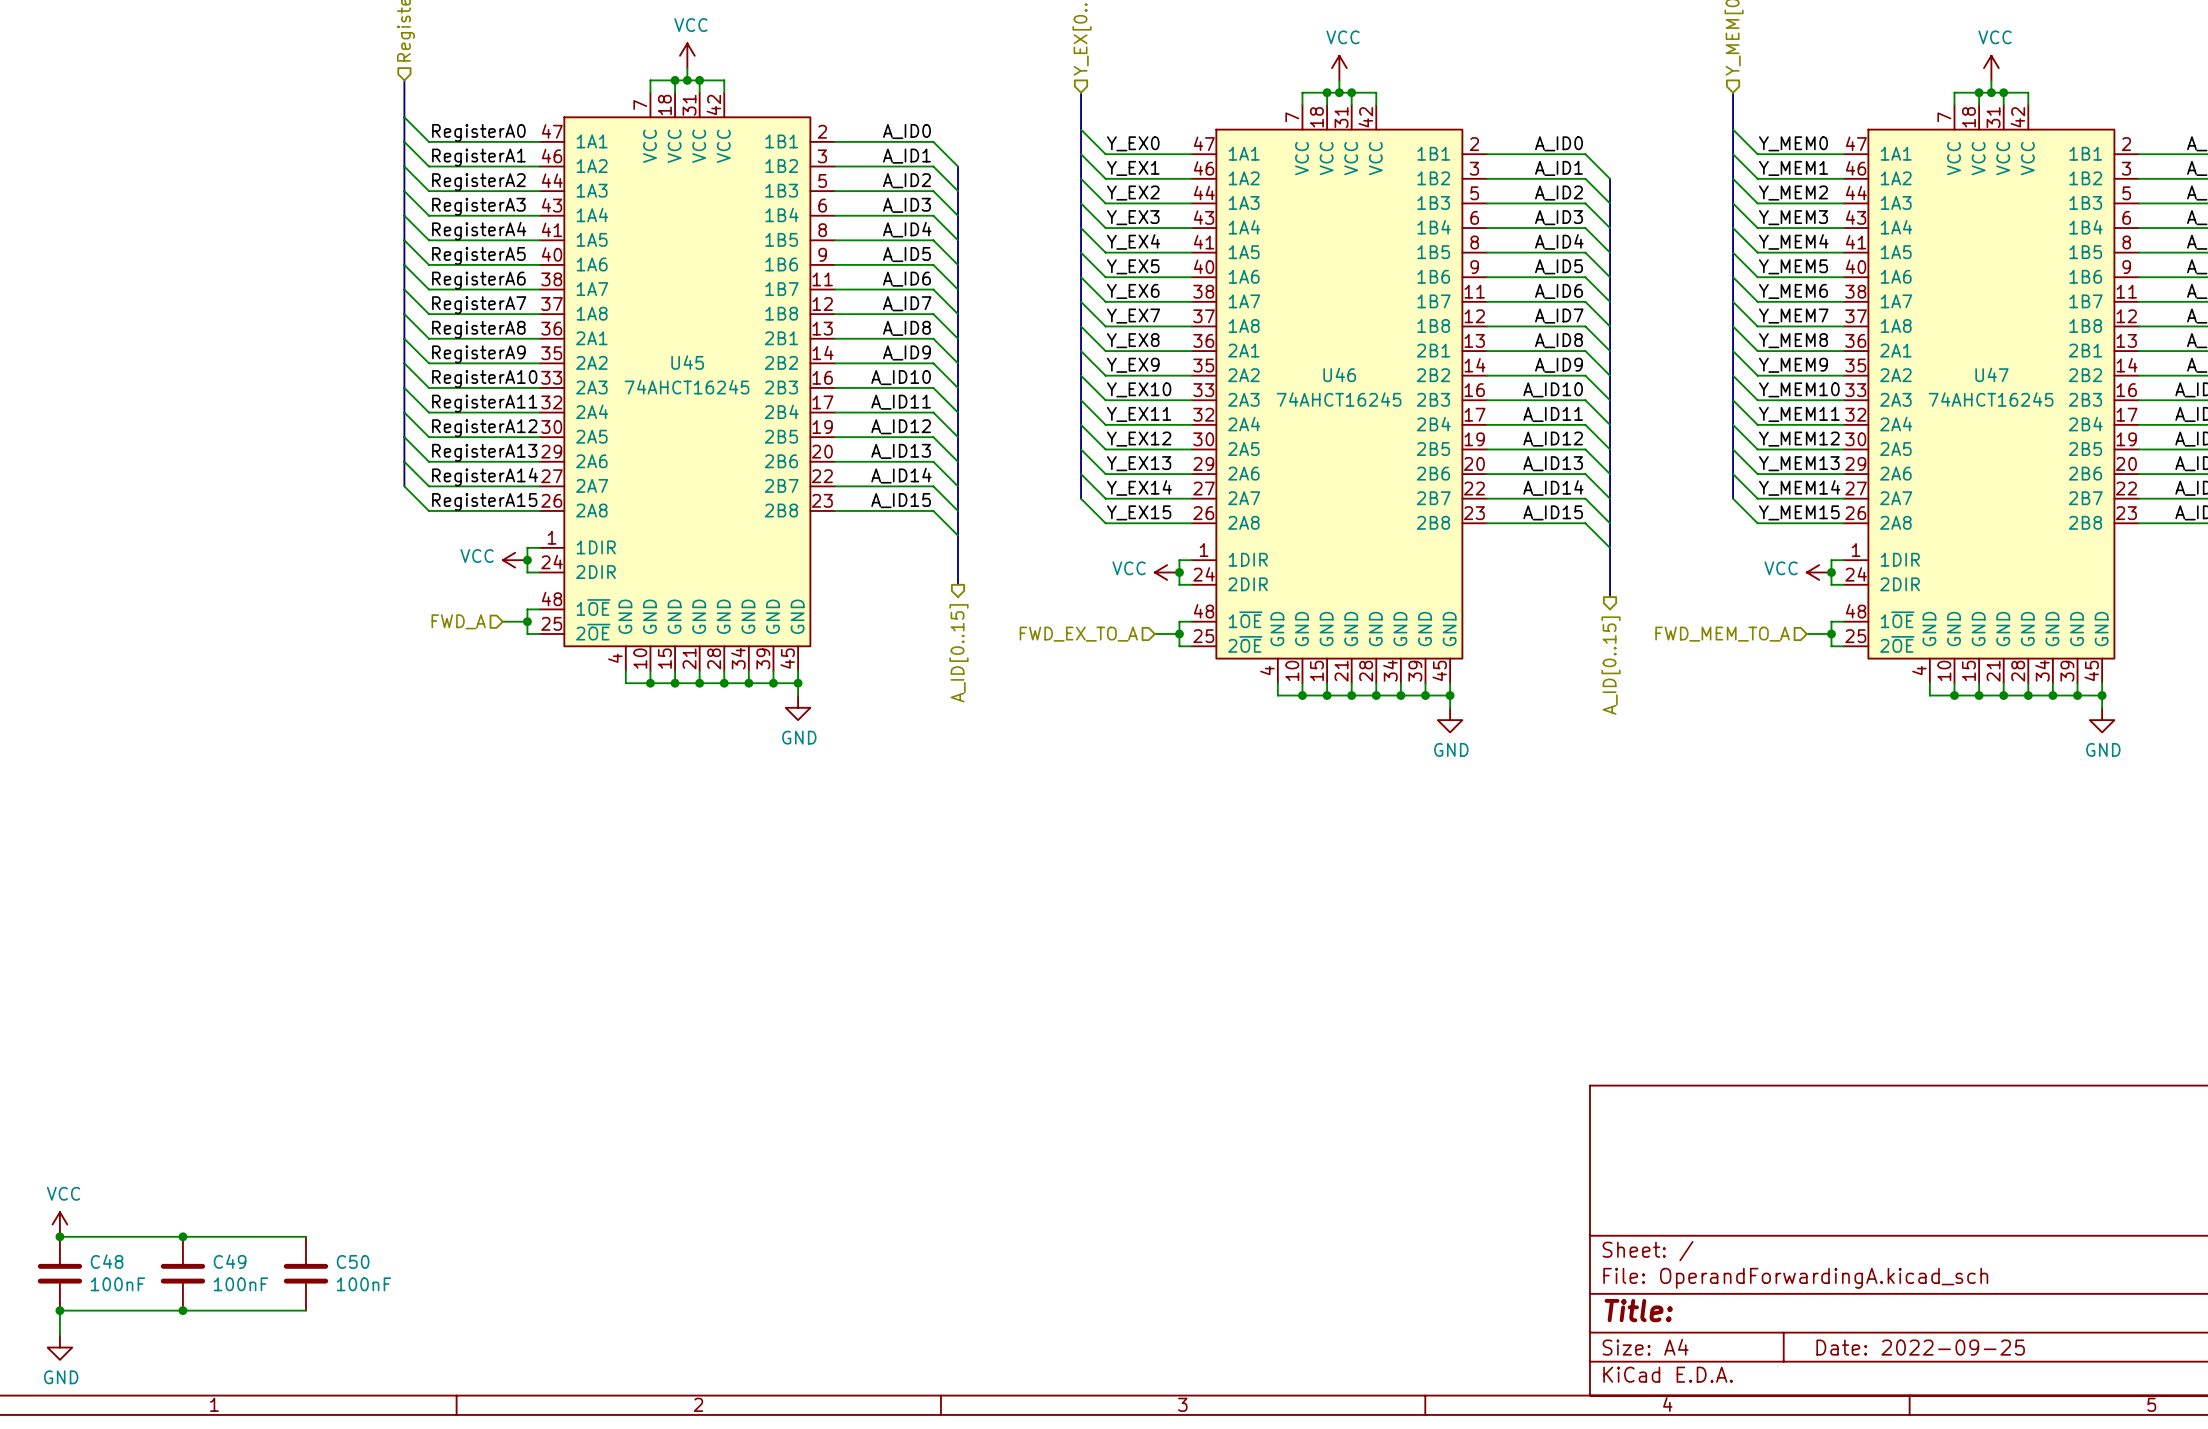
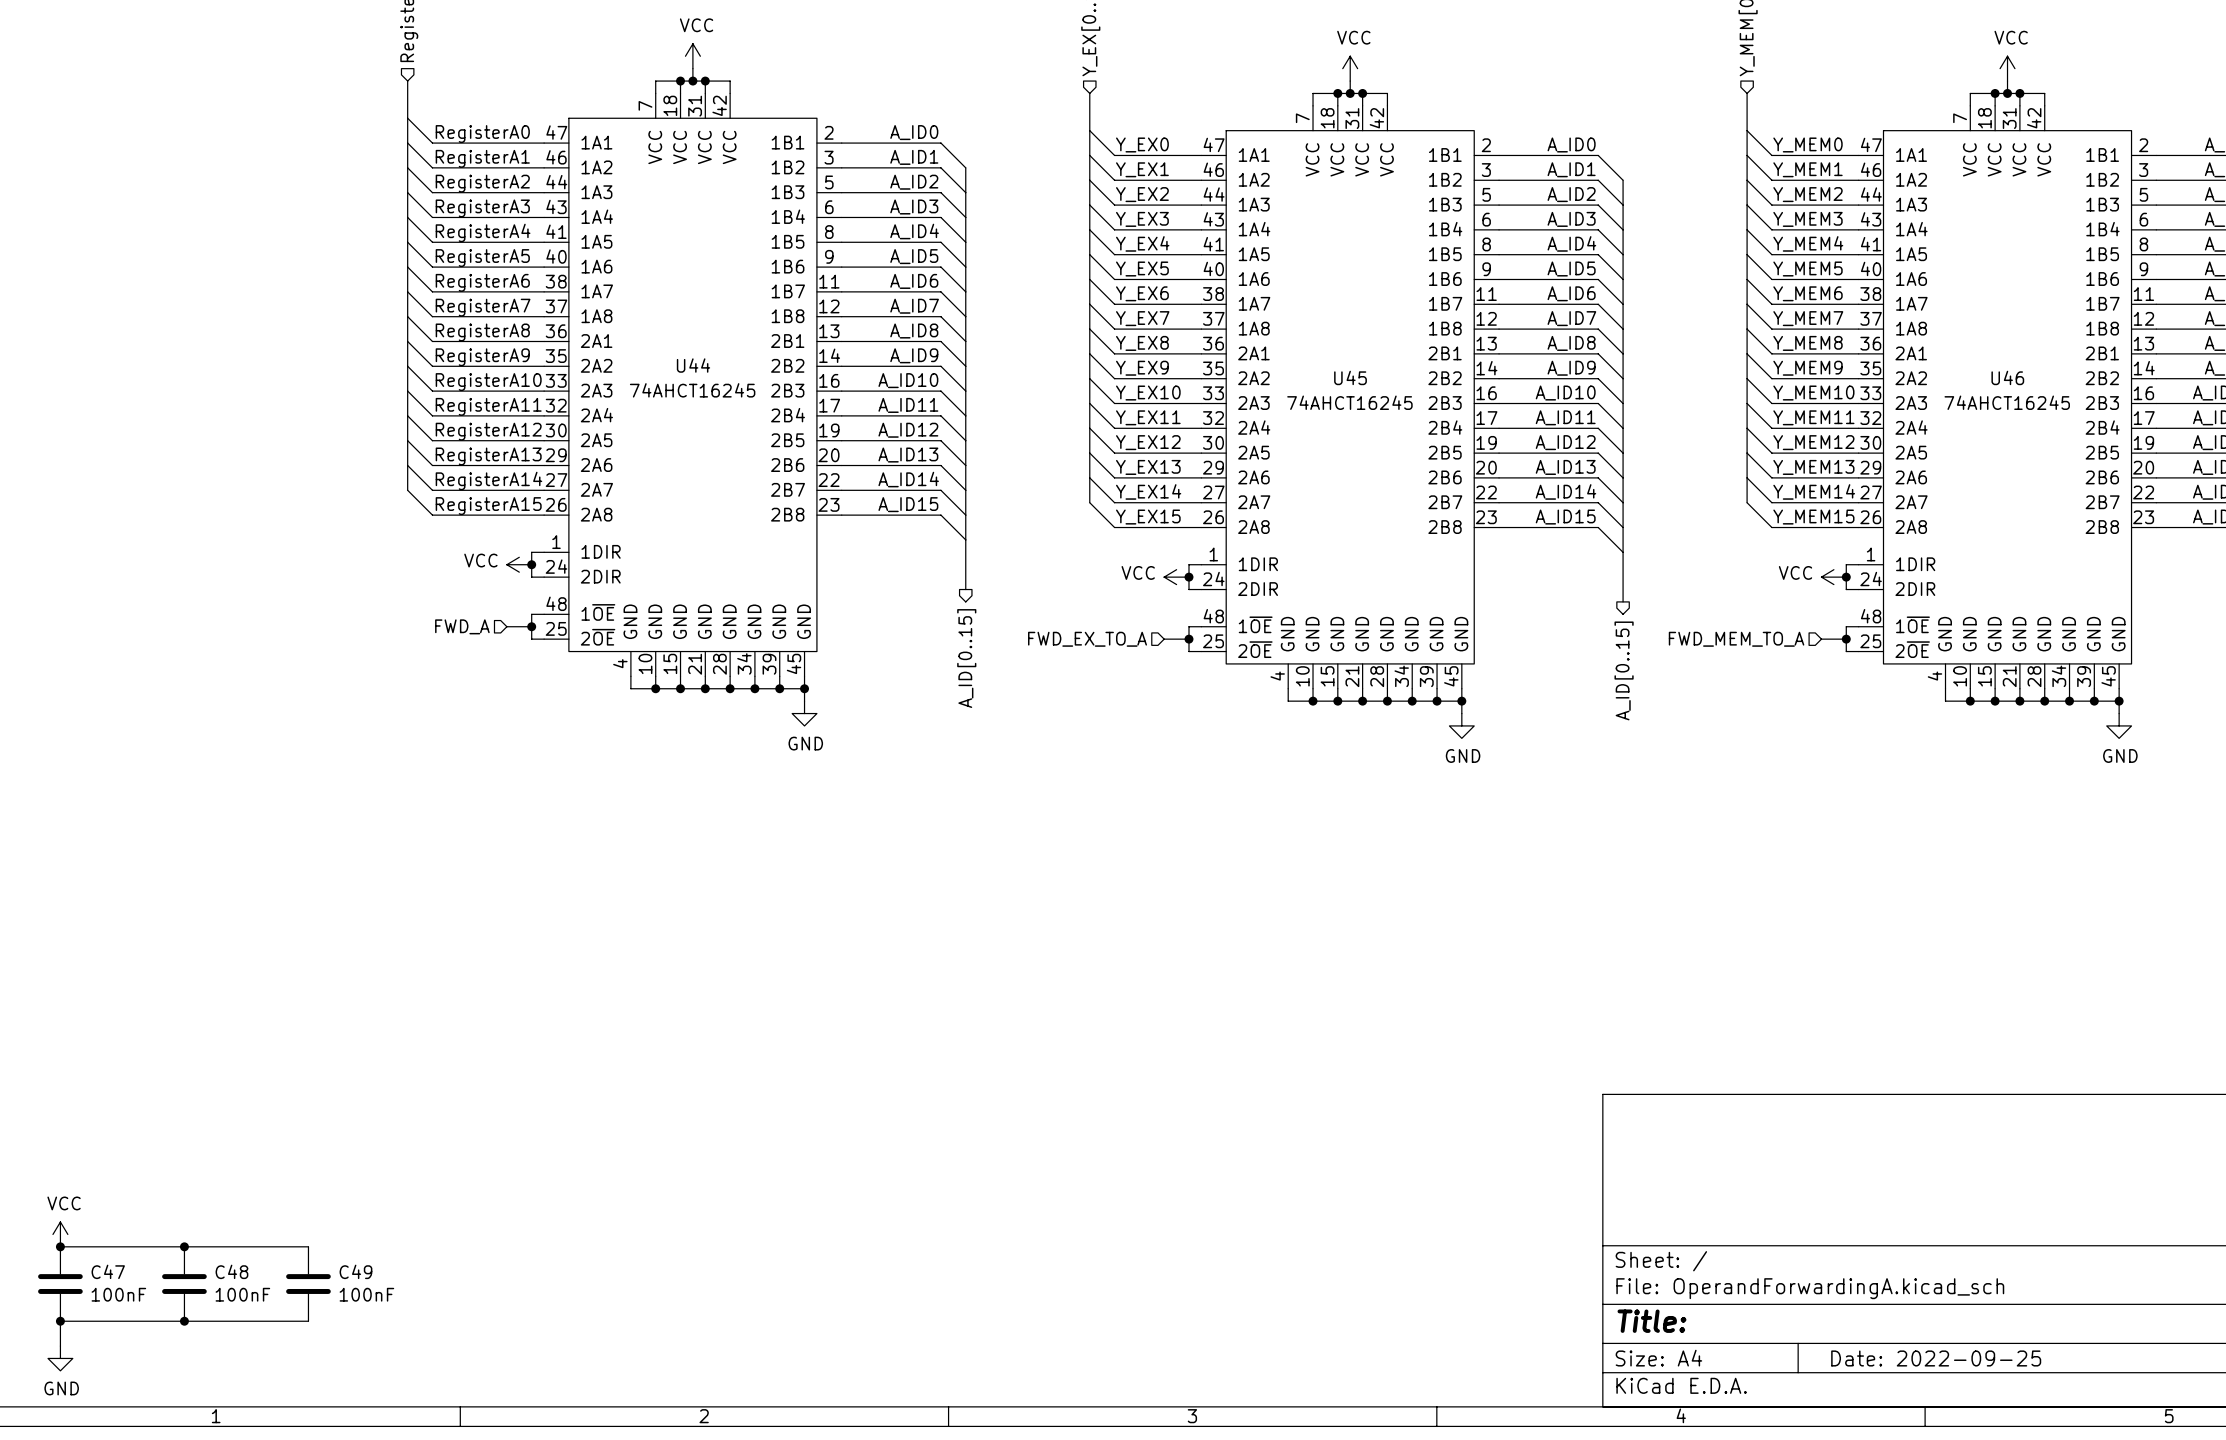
U45 name: U45 (687, 362) -> U44 (693, 365)
U46 name: U46 (1339, 374) -> U45 (1350, 377)
U47 name: U47 (1991, 374) -> U46 (2007, 377)
C48 name: C48 (107, 1261) -> C47 (108, 1271)
C49 name: C49 (230, 1261) -> C48 (231, 1271)
C50 name: C50 (353, 1261) -> C49 (355, 1271)

